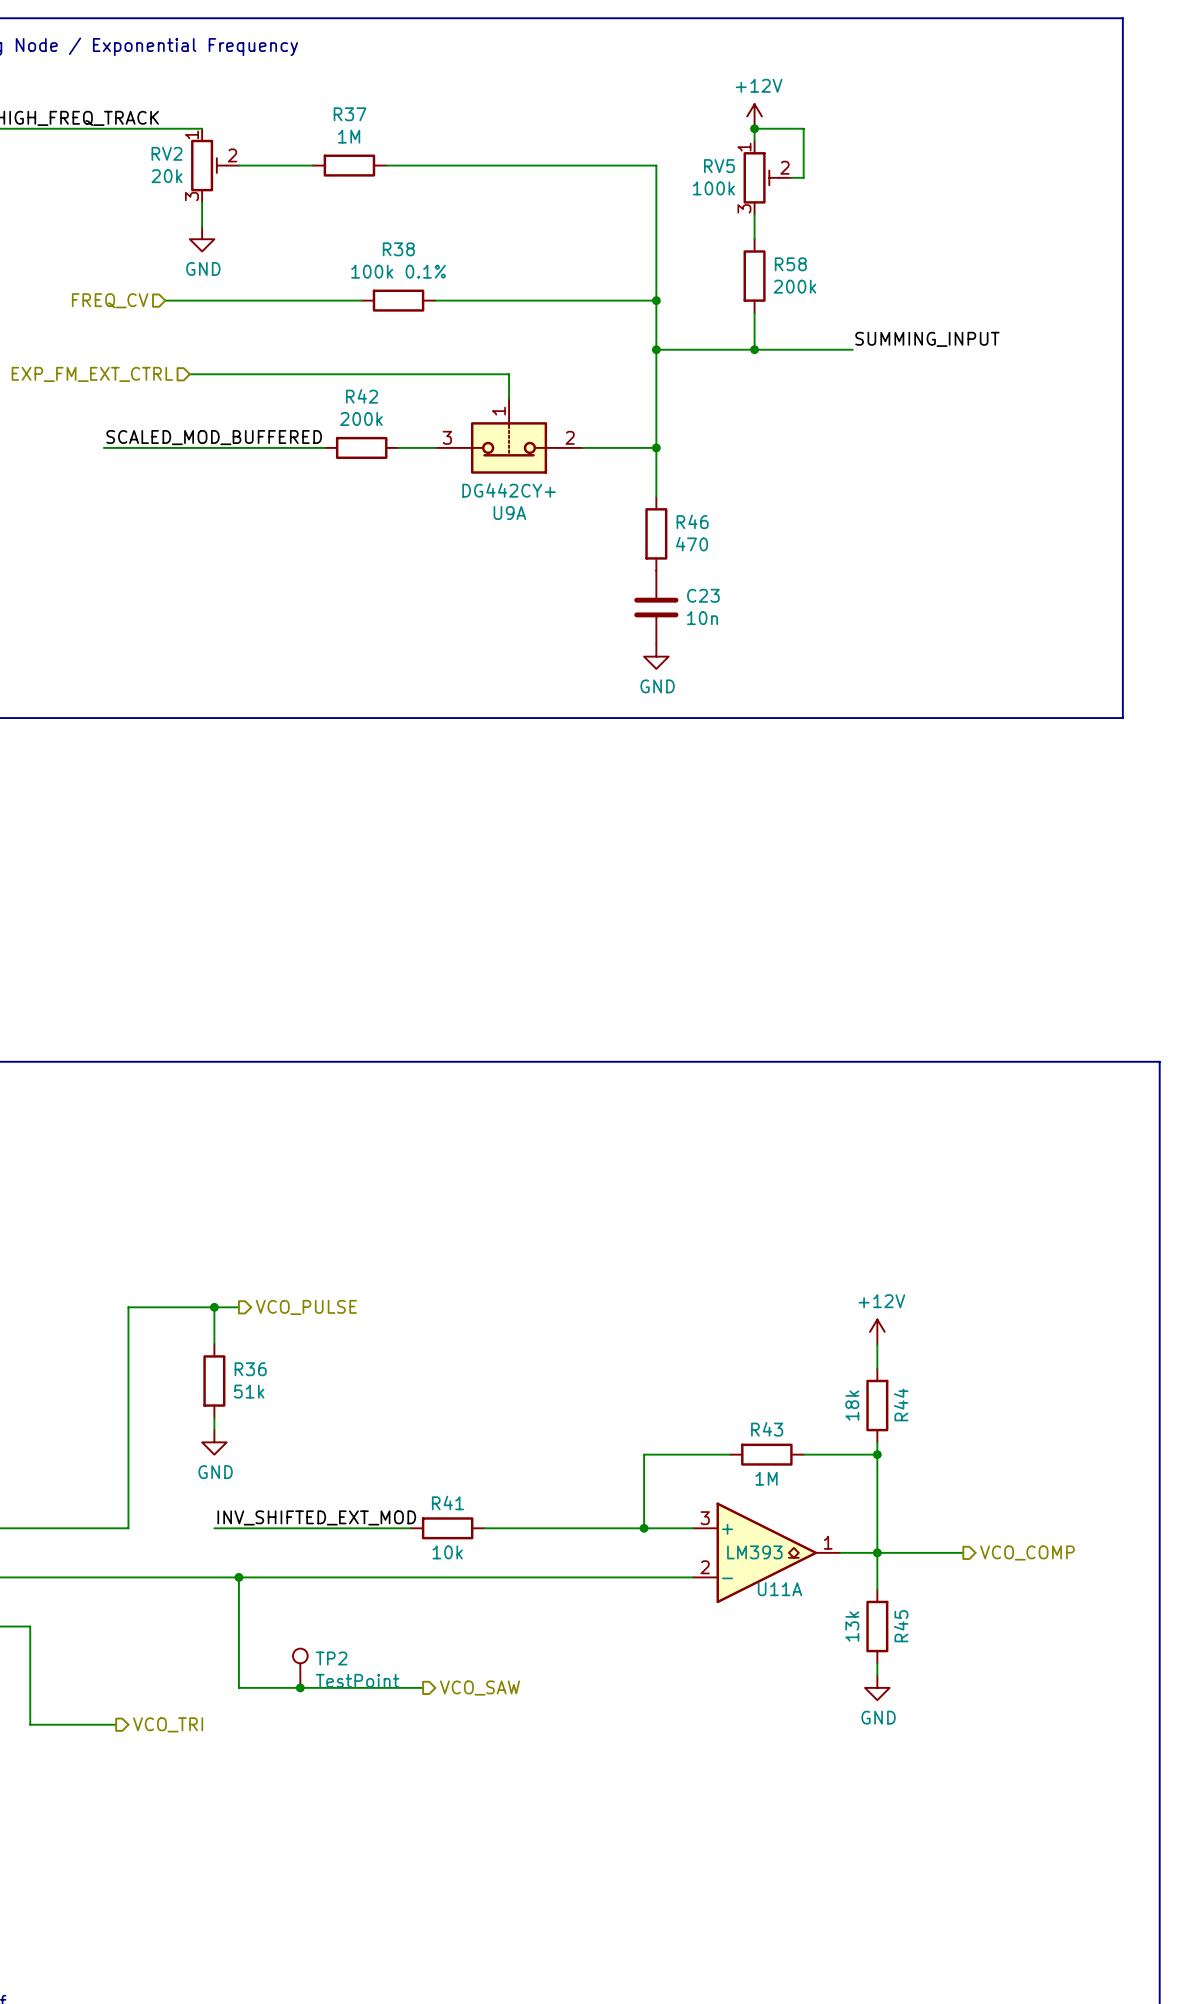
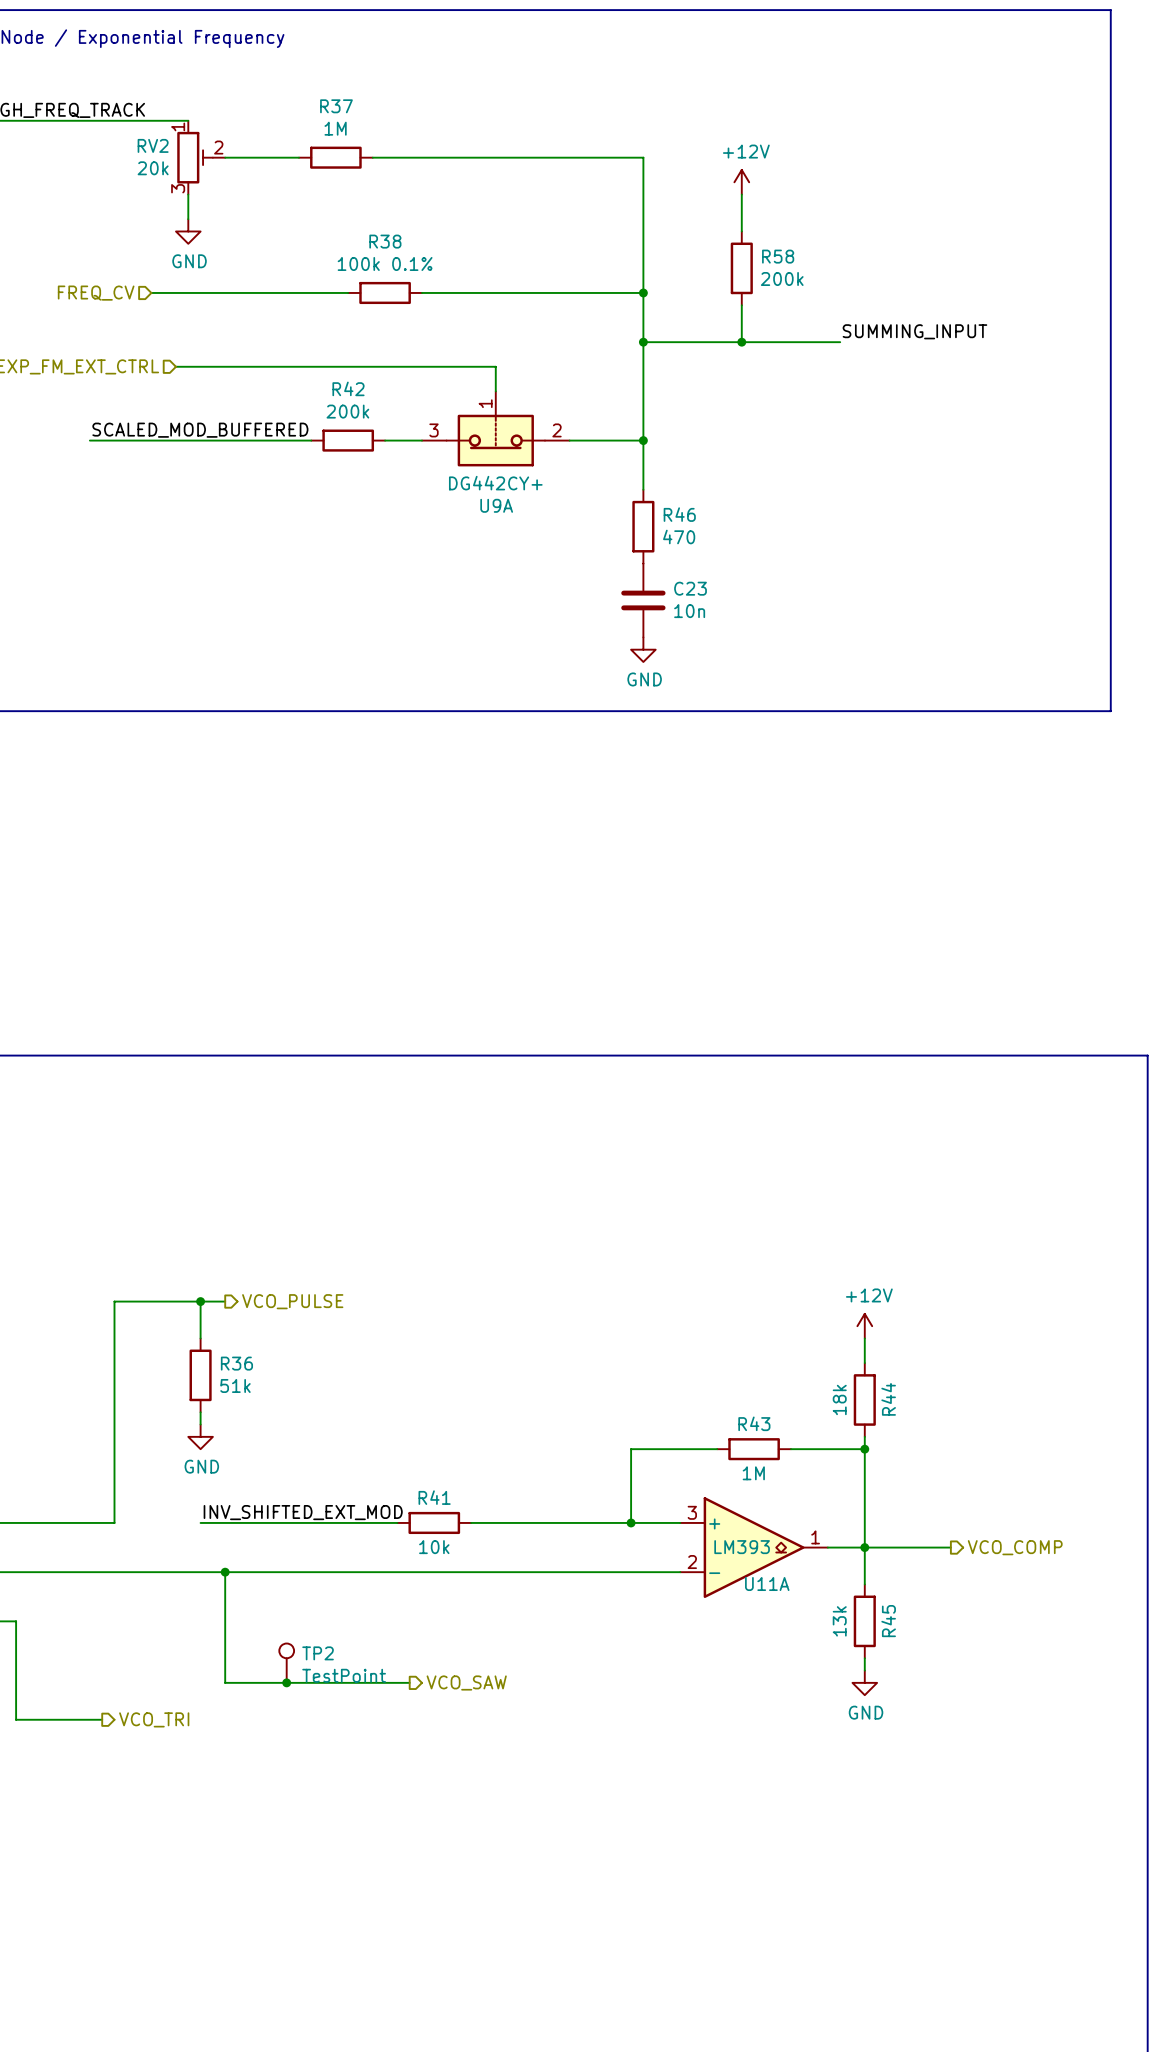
power symbol position: +12V (754, 116) -> +12V (741, 182)
junction: (754, 128) -> none
wire: (754, 141) (754, 128) (803, 128) (803, 177) (791, 177) -> none
RV5: 100k (767, 177) -> none

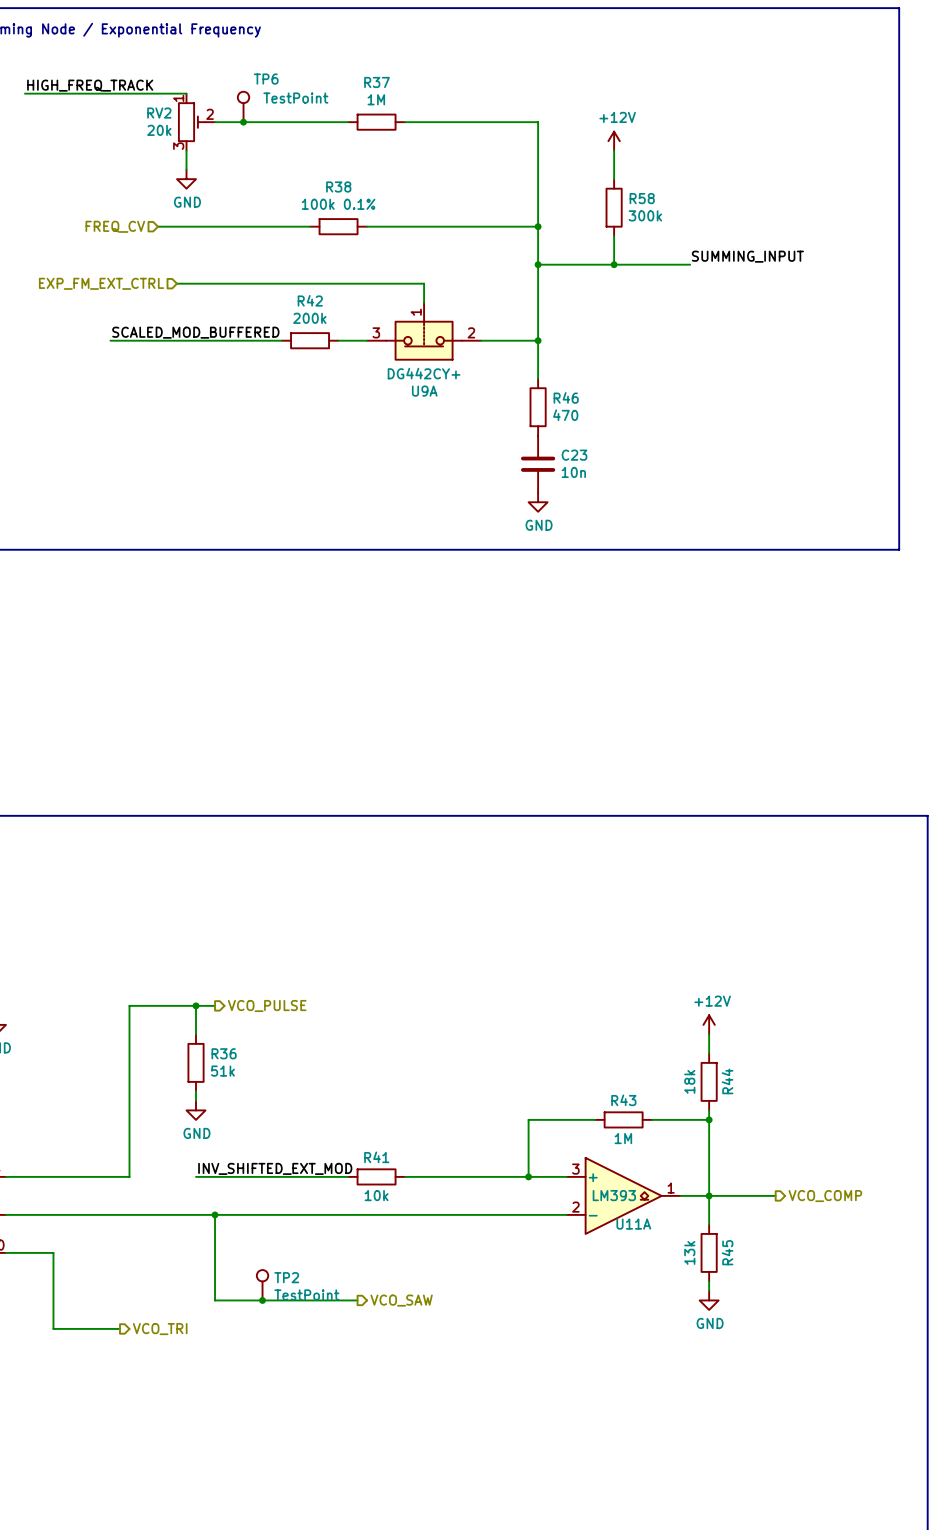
TP6: none -> TestPoint (243, 106)
junction: none -> (243, 122)
R37 position: (335, 157) -> (376, 122)
wire: (397, 157) (471, 157) -> (272, 122) (329, 122)
R58 value: 200k (782, 278) -> 300k (645, 215)

